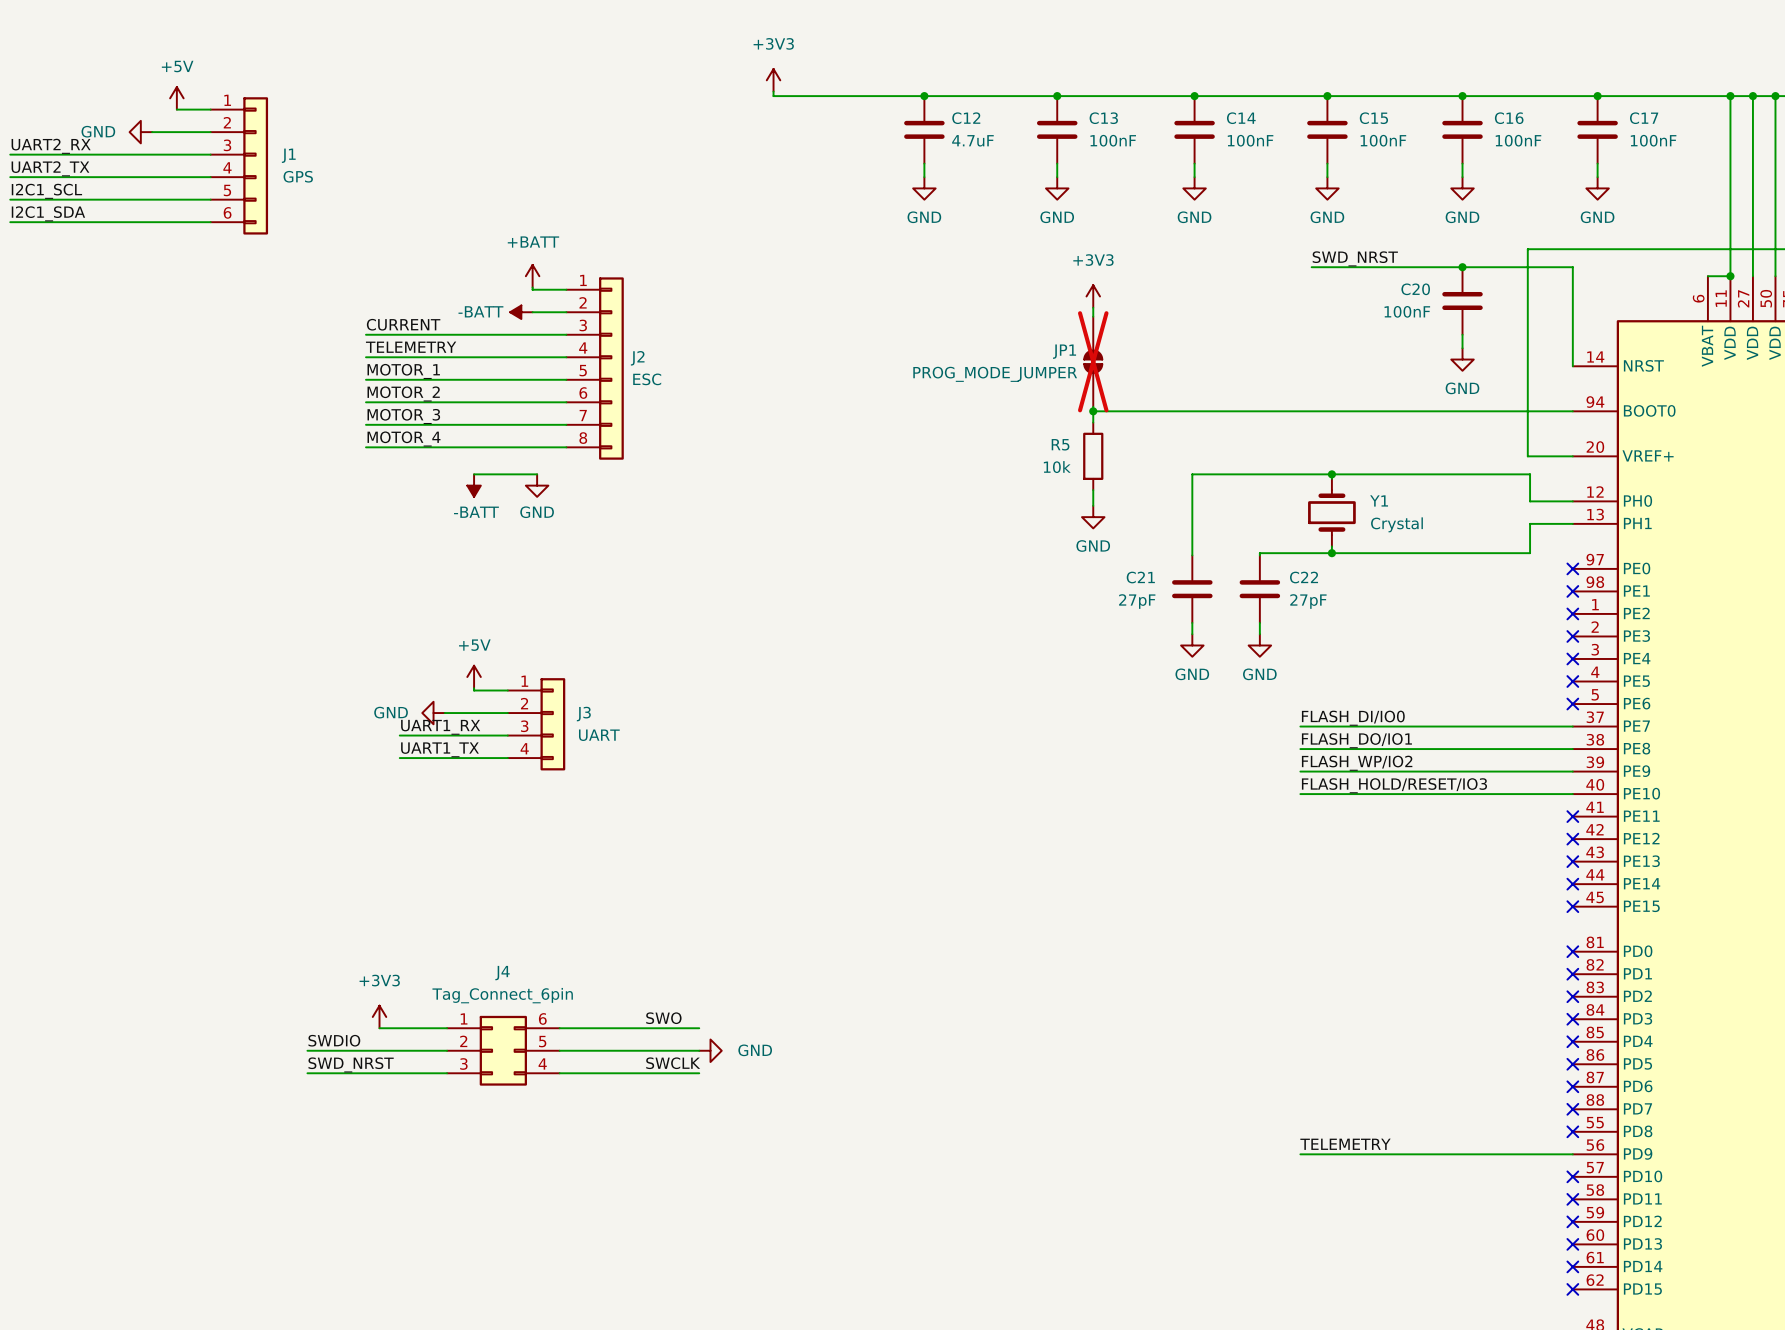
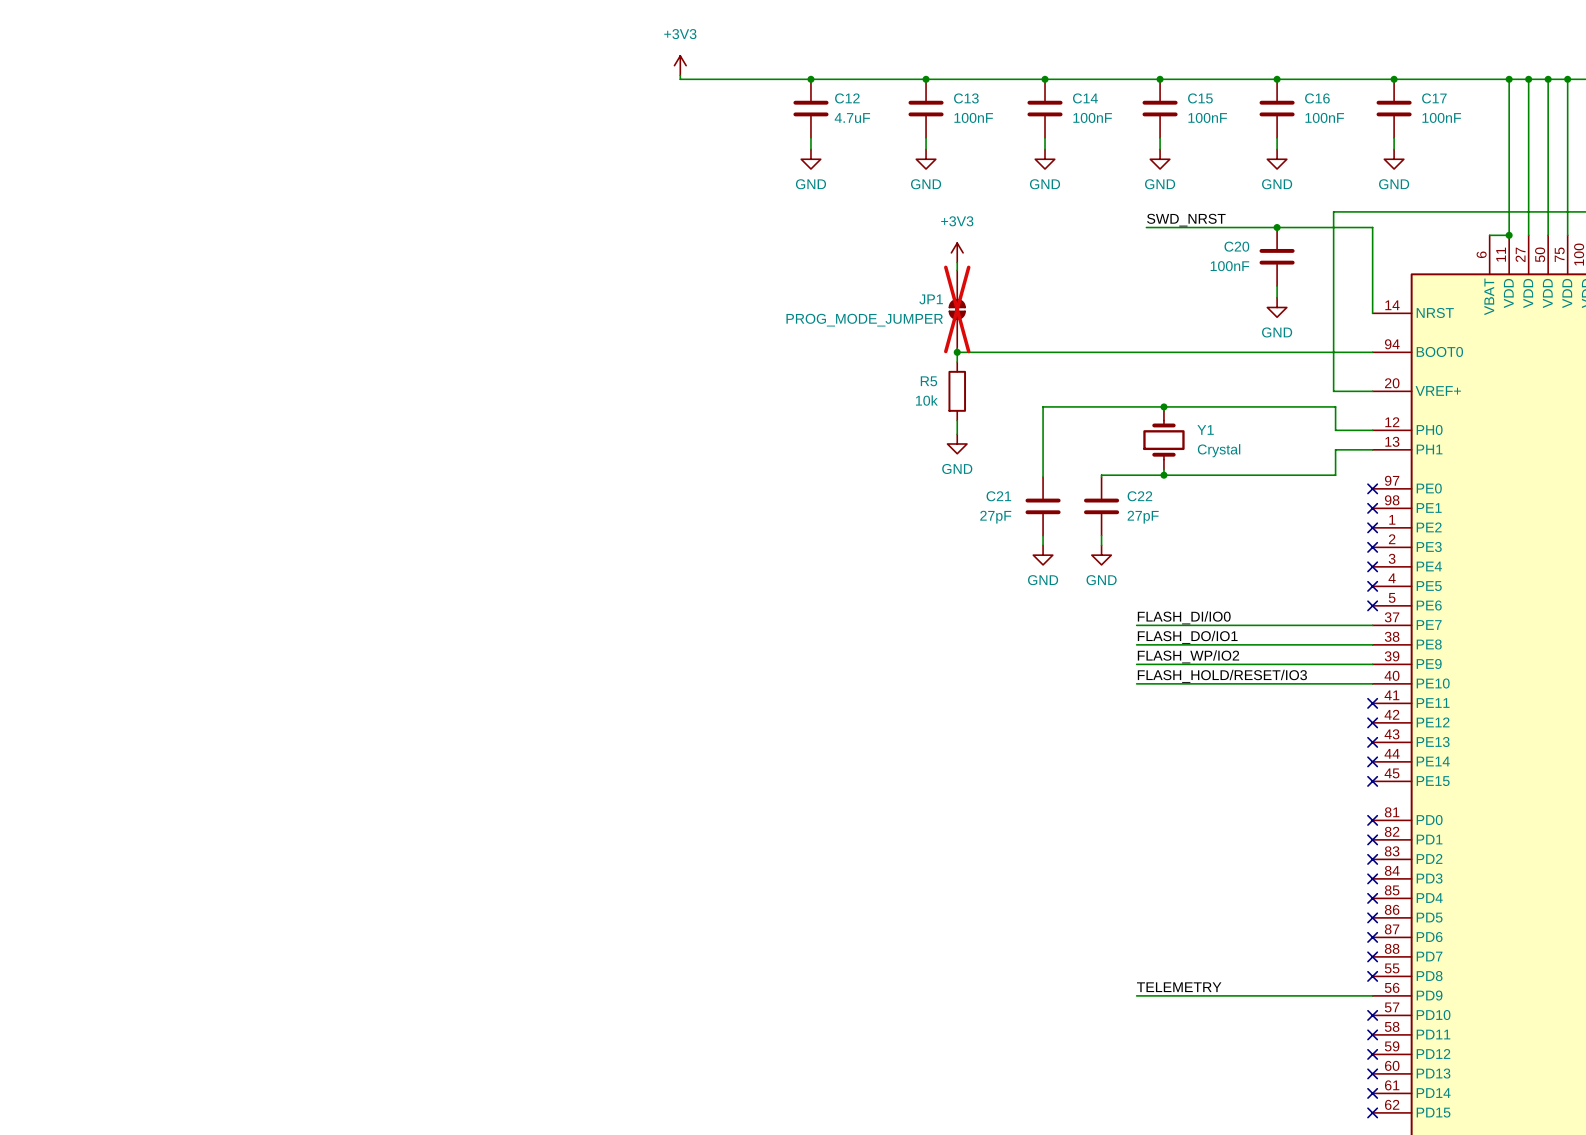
power symbol: +5V (176, 98) -> none
wire: (176, 109) (210, 109) -> none
power symbol: GND (140, 132) -> none
wire: (152, 132) (210, 132) -> none
label: UART2_RX (51, 146) -> none
wire: (10, 154) (210, 154) -> none
J1: GPS (239, 165) -> none
label: UART2_TX (50, 168) -> none
wire: (10, 177) (210, 177) -> none
label: I2C1_SCL (46, 191) -> none
wire: (10, 199) (210, 199) -> none
label: I2C1_SDA (48, 213) -> none
wire: (10, 222) (210, 222) -> none
power symbol: +BATT (532, 276) -> none
wire: (532, 287) (532, 289) (566, 289) -> none
power symbol: -BATT (521, 312) -> none
wire: (532, 312) (566, 312) -> none
label: CURRENT (403, 324) -> none
wire: (366, 334) (566, 334) -> none
label: TELEMETRY (411, 347) -> none
wire: (366, 357) (566, 357) -> none
J2: ESC (595, 368) -> none
label: MOTOR_1 (403, 371) -> none
wire: (366, 379) (566, 379) -> none
label: MOTOR_2 (403, 393) -> none
wire: (366, 402) (566, 402) -> none
label: MOTOR_3 (403, 416) -> none
wire: (366, 424) (566, 424) -> none
label: MOTOR_4 (403, 439) -> none
wire: (366, 447) (566, 447) -> none
wire: (474, 474) (537, 474) -> none
power symbol: -BATT (474, 485) -> none
power symbol: GND (537, 485) -> none
power symbol: +5V (474, 677) -> none
wire: (474, 688) (474, 690) (507, 690) -> none
power symbol: GND (433, 713) -> none
wire: (444, 713) (507, 713) -> none
J3: UART (536, 724) -> none
label: UART1_RX (440, 727) -> none
wire: (399, 735) (507, 735) -> none
label: UART1_TX (439, 749) -> none
wire: (399, 758) (507, 758) -> none
power symbol: +3V3 (379, 1016) -> none
label: SWO (663, 1018) -> none
wire: (379, 1028) (447, 1028) -> none
wire: (559, 1028) (699, 1028) -> none
label: SWDIO (334, 1040) -> none
wire: (307, 1050) (447, 1050) -> none
J4: Tag_Connect_6pin (503, 1050) -> none
wire: (559, 1050) (699, 1050) -> none
power symbol: GND (710, 1050) -> none
label: SWCLK (673, 1063) -> none
label: SWD_NRST (351, 1064) -> none
wire: (307, 1073) (447, 1073) -> none
wire: (559, 1073) (699, 1073) -> none

